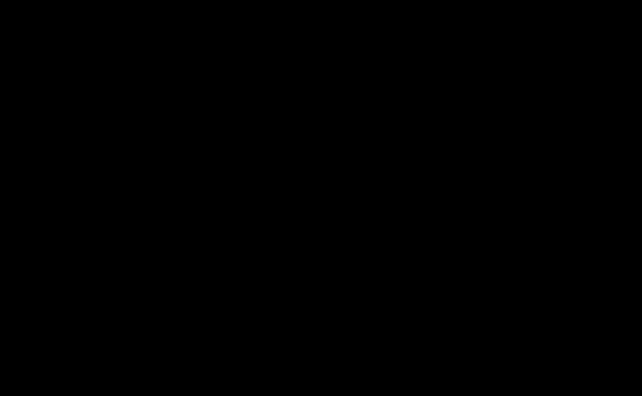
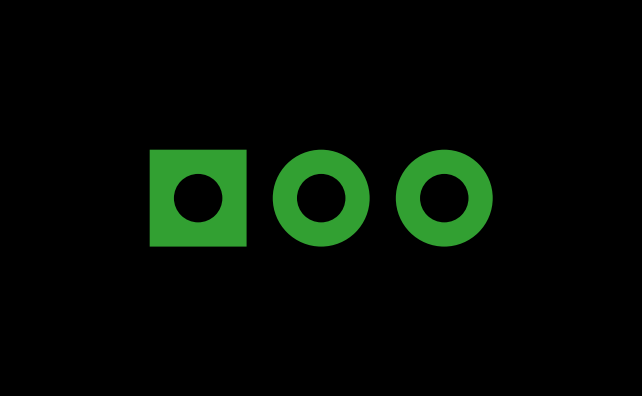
part: none -> (321, 198)

